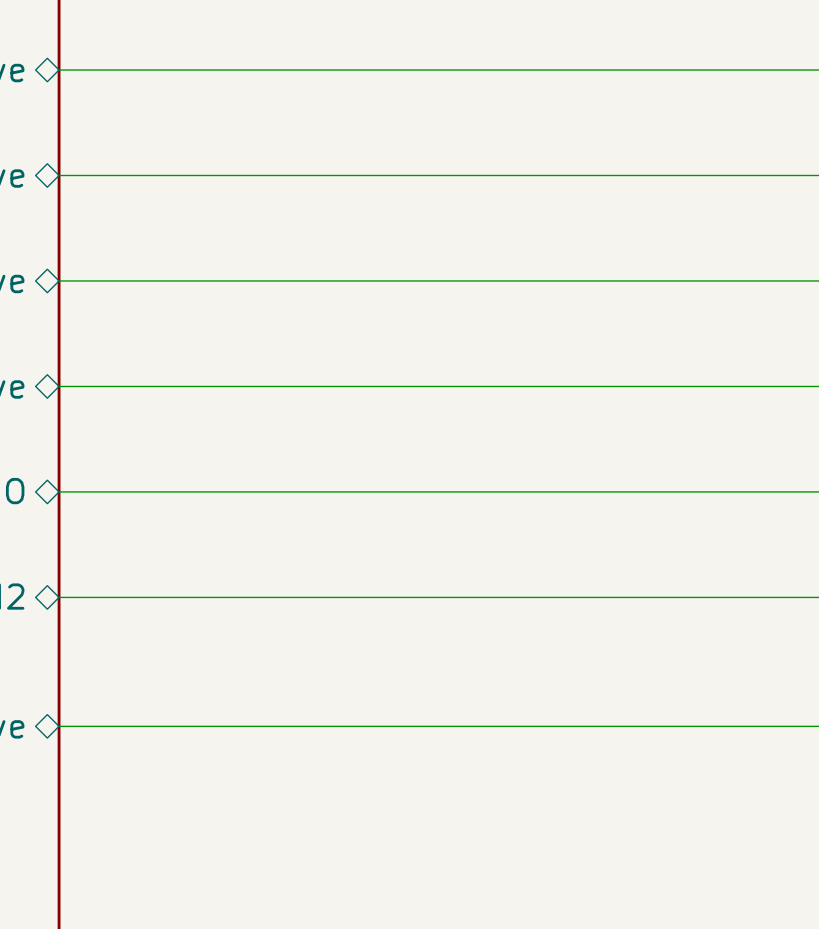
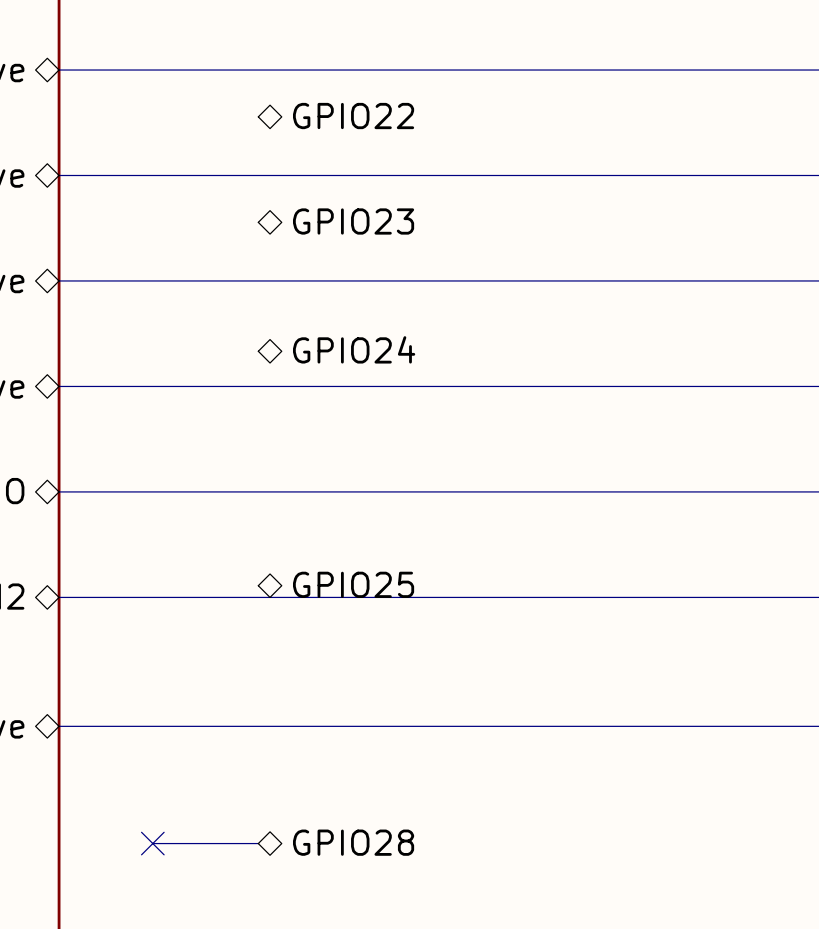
sheet pin: none -> GPIO22 (353, 116)
sheet pin: none -> GPIO23 (353, 221)
sheet pin: none -> GPIO24 (354, 349)
sheet pin: none -> GPIO25 (353, 584)
sheet pin: none -> GPIO28 (353, 842)
wire: none -> (152, 843) (258, 843)
no-connect mark: none -> (152, 843)

